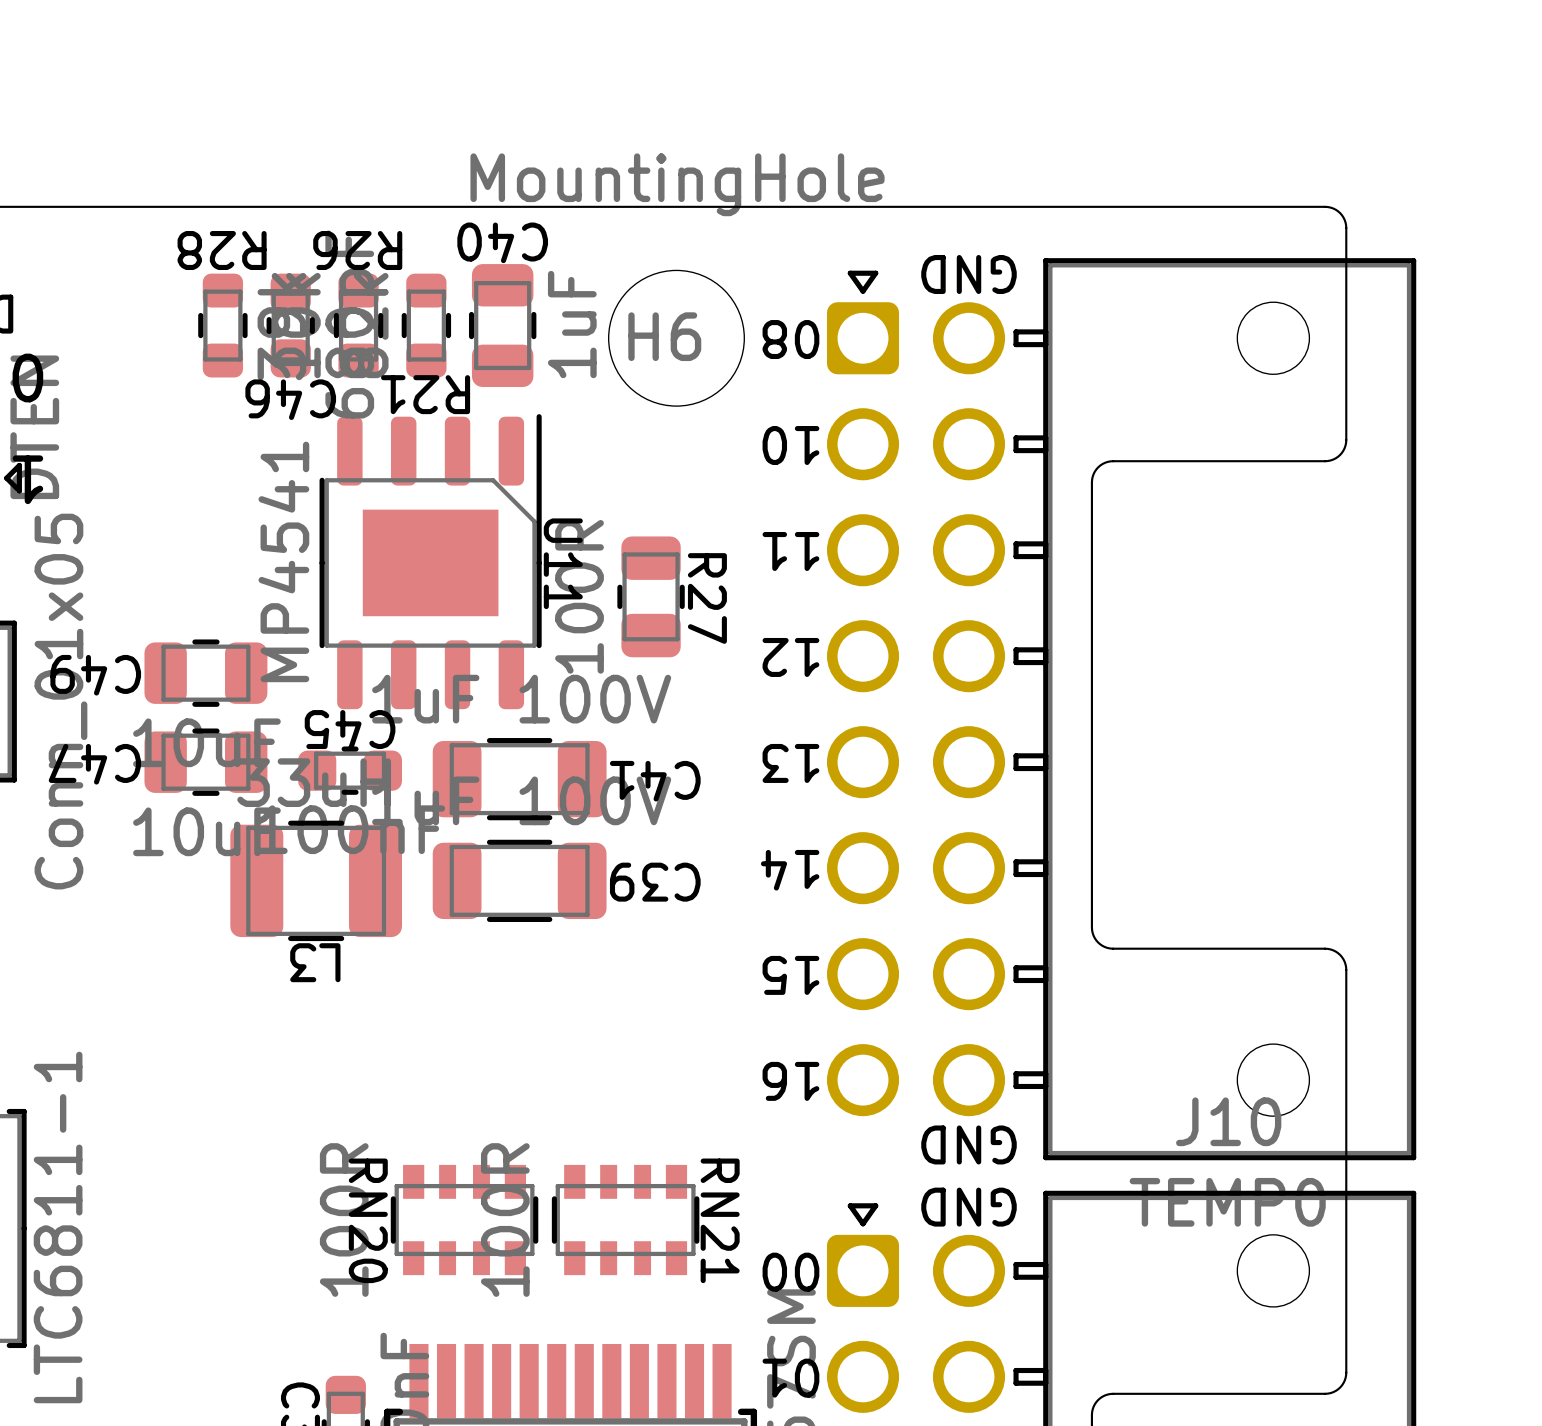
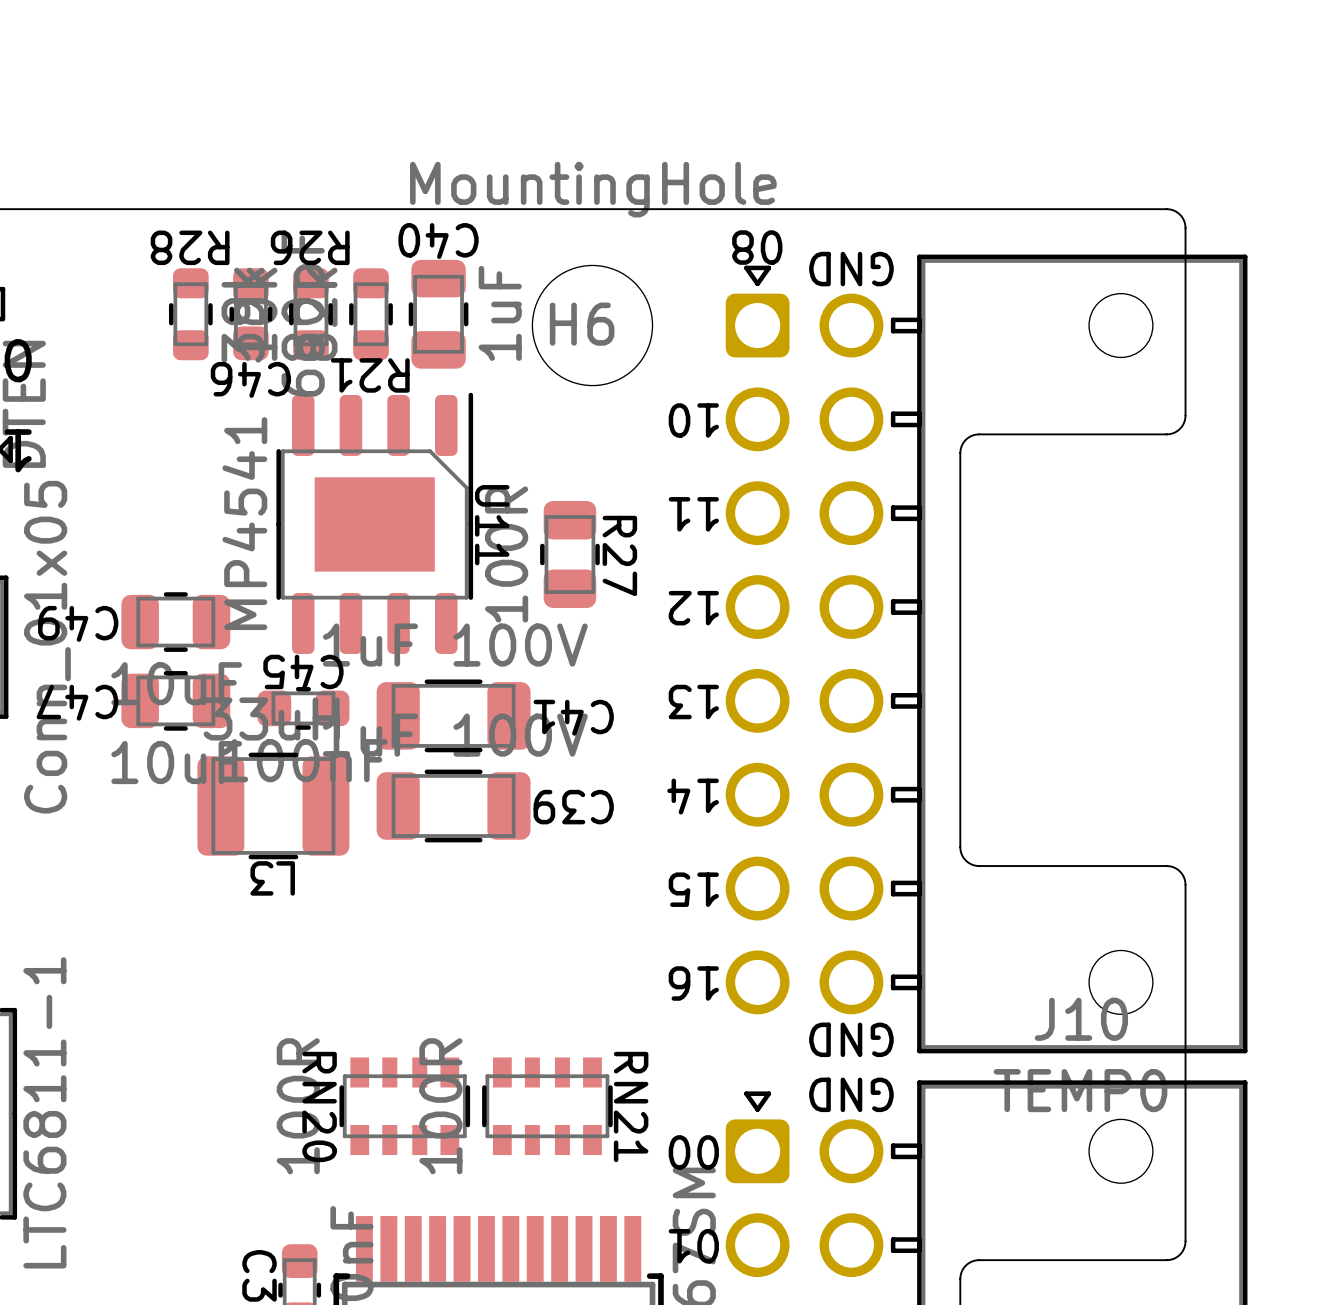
text position: 08 (790, 339) -> 08 (757, 247)

